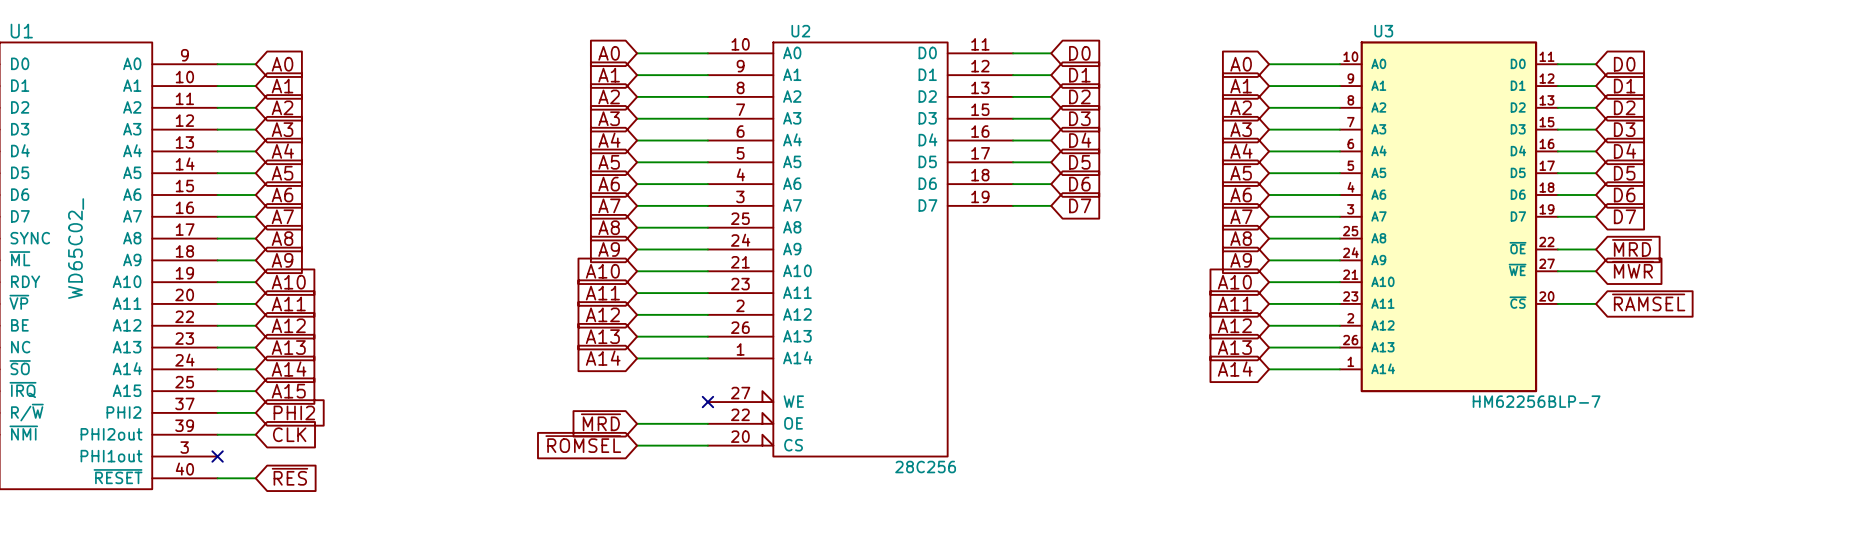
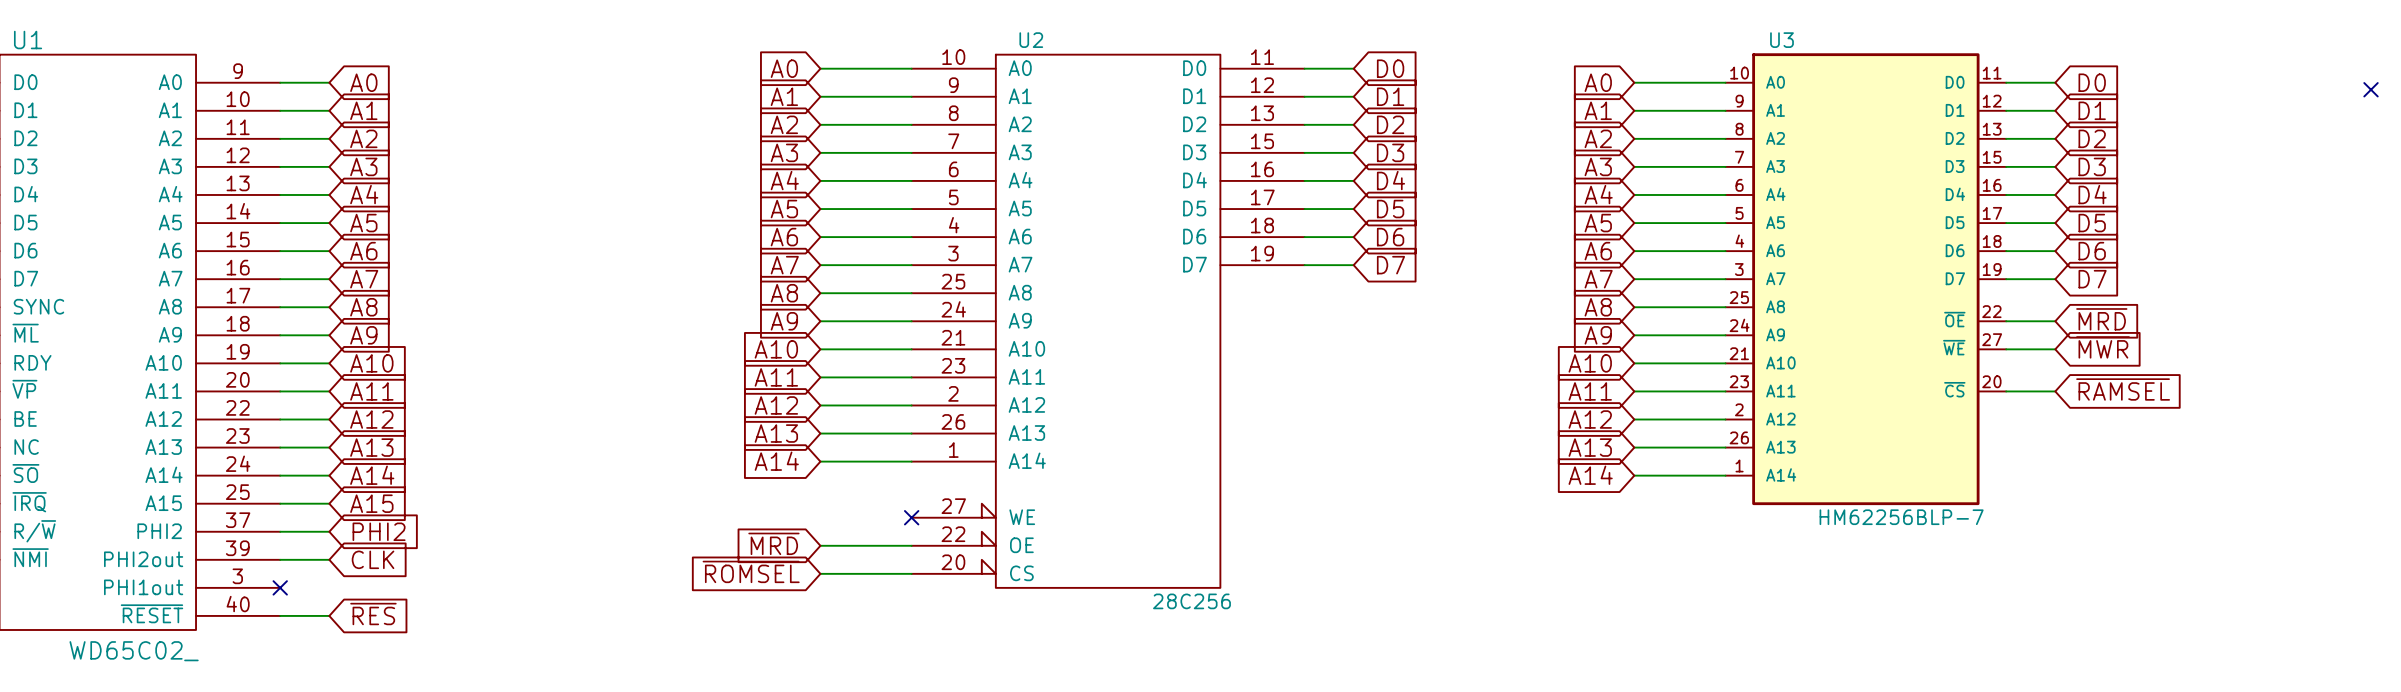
no-connect mark: none -> (2371, 89)
U1 value rotation: 0° (76, 248) -> 90° clockwise (134, 651)
U1 value position: WD65C02_ (76, 248) -> WD65C02_ (134, 651)
U3 value position: HM62256BLP-7 (1536, 401) -> HM62256BLP-7 (1901, 517)

